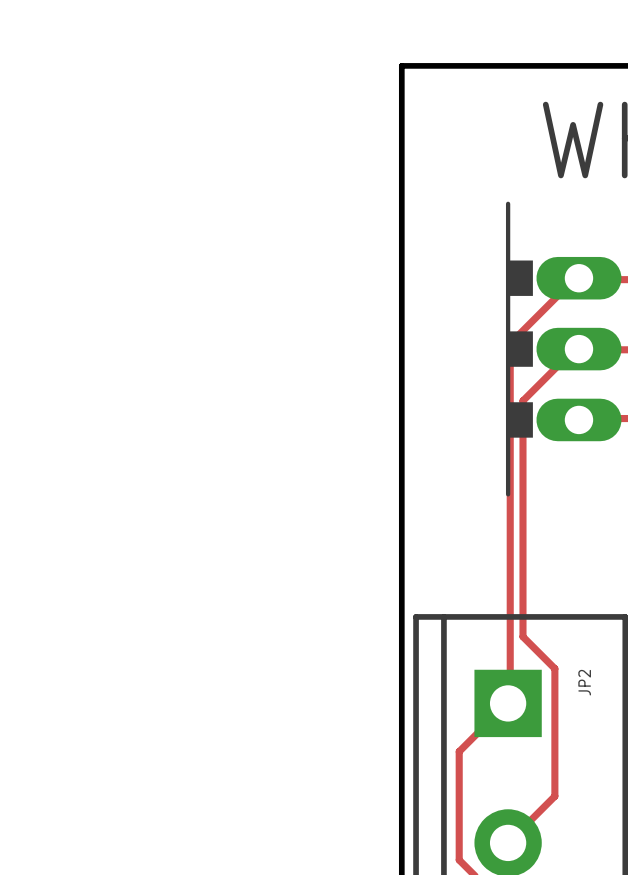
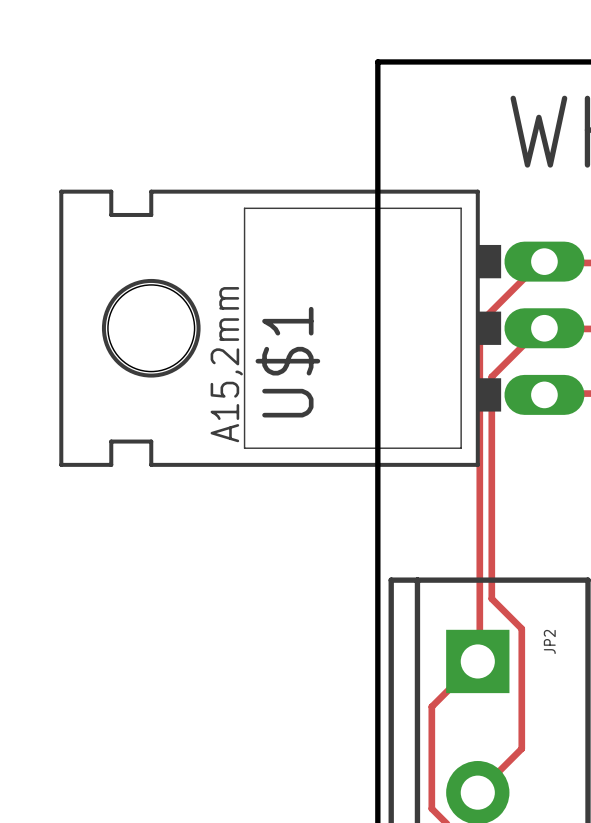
U$1: none -> (321, 328)
part: (563, 349) -> none

